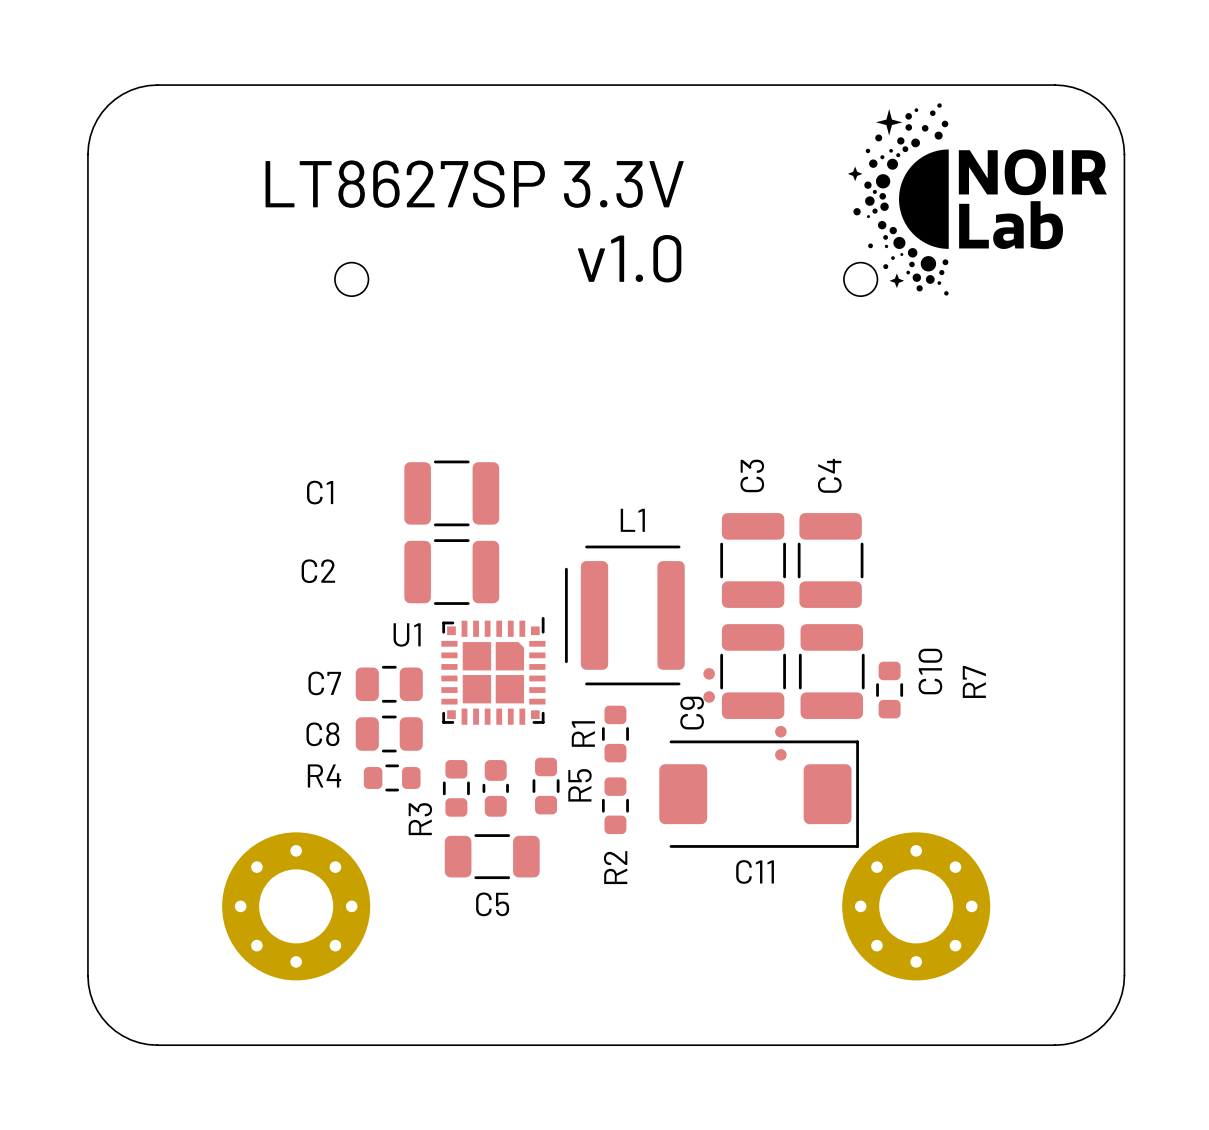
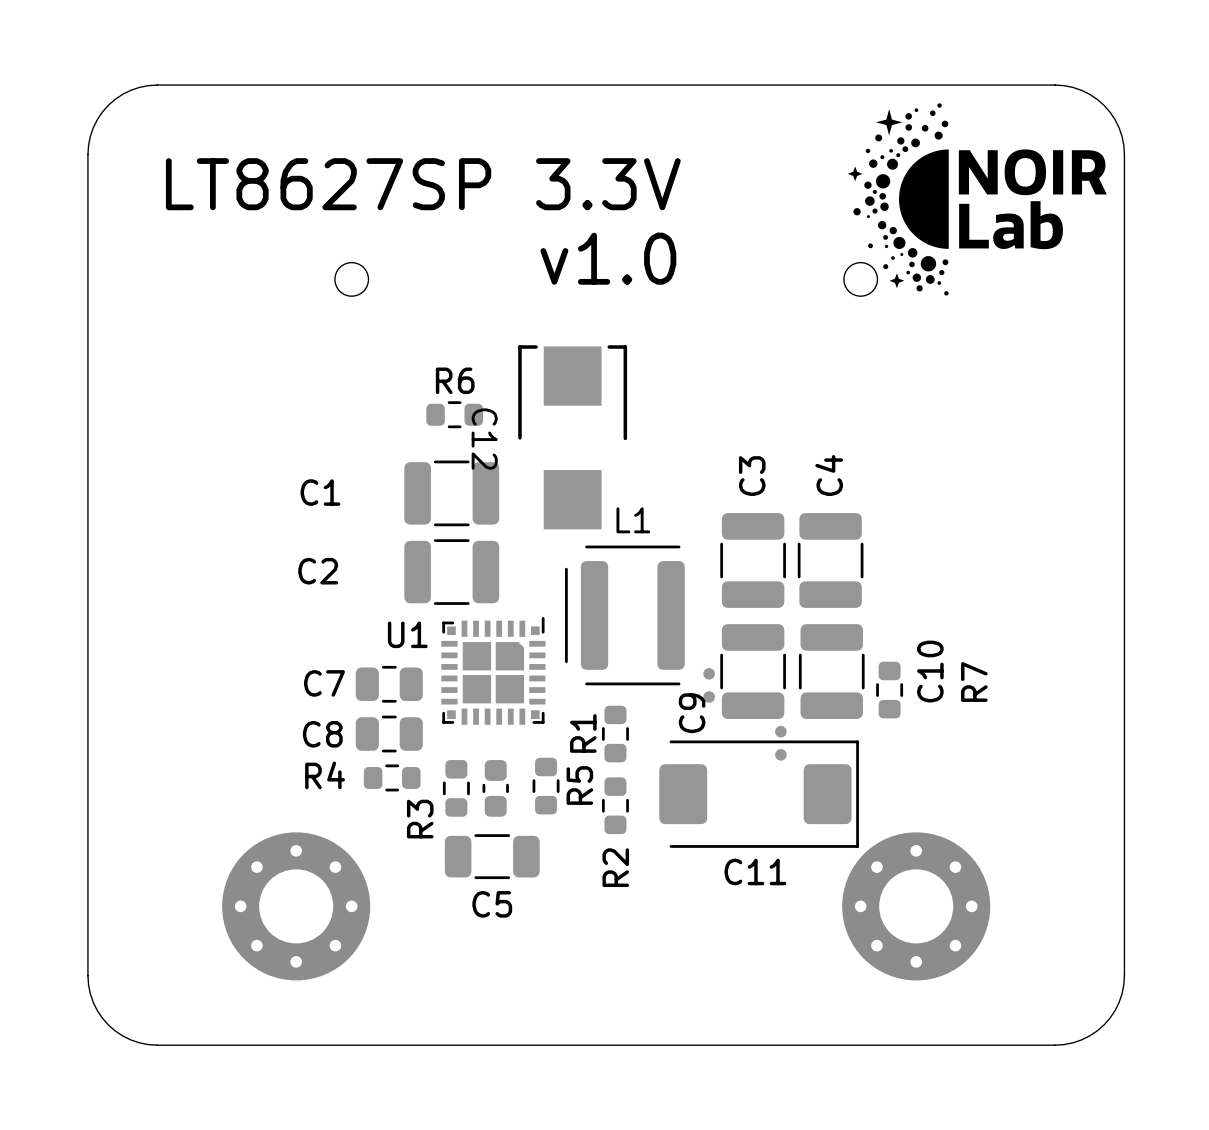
R6: none -> (454, 414)
C12: none -> (572, 437)

